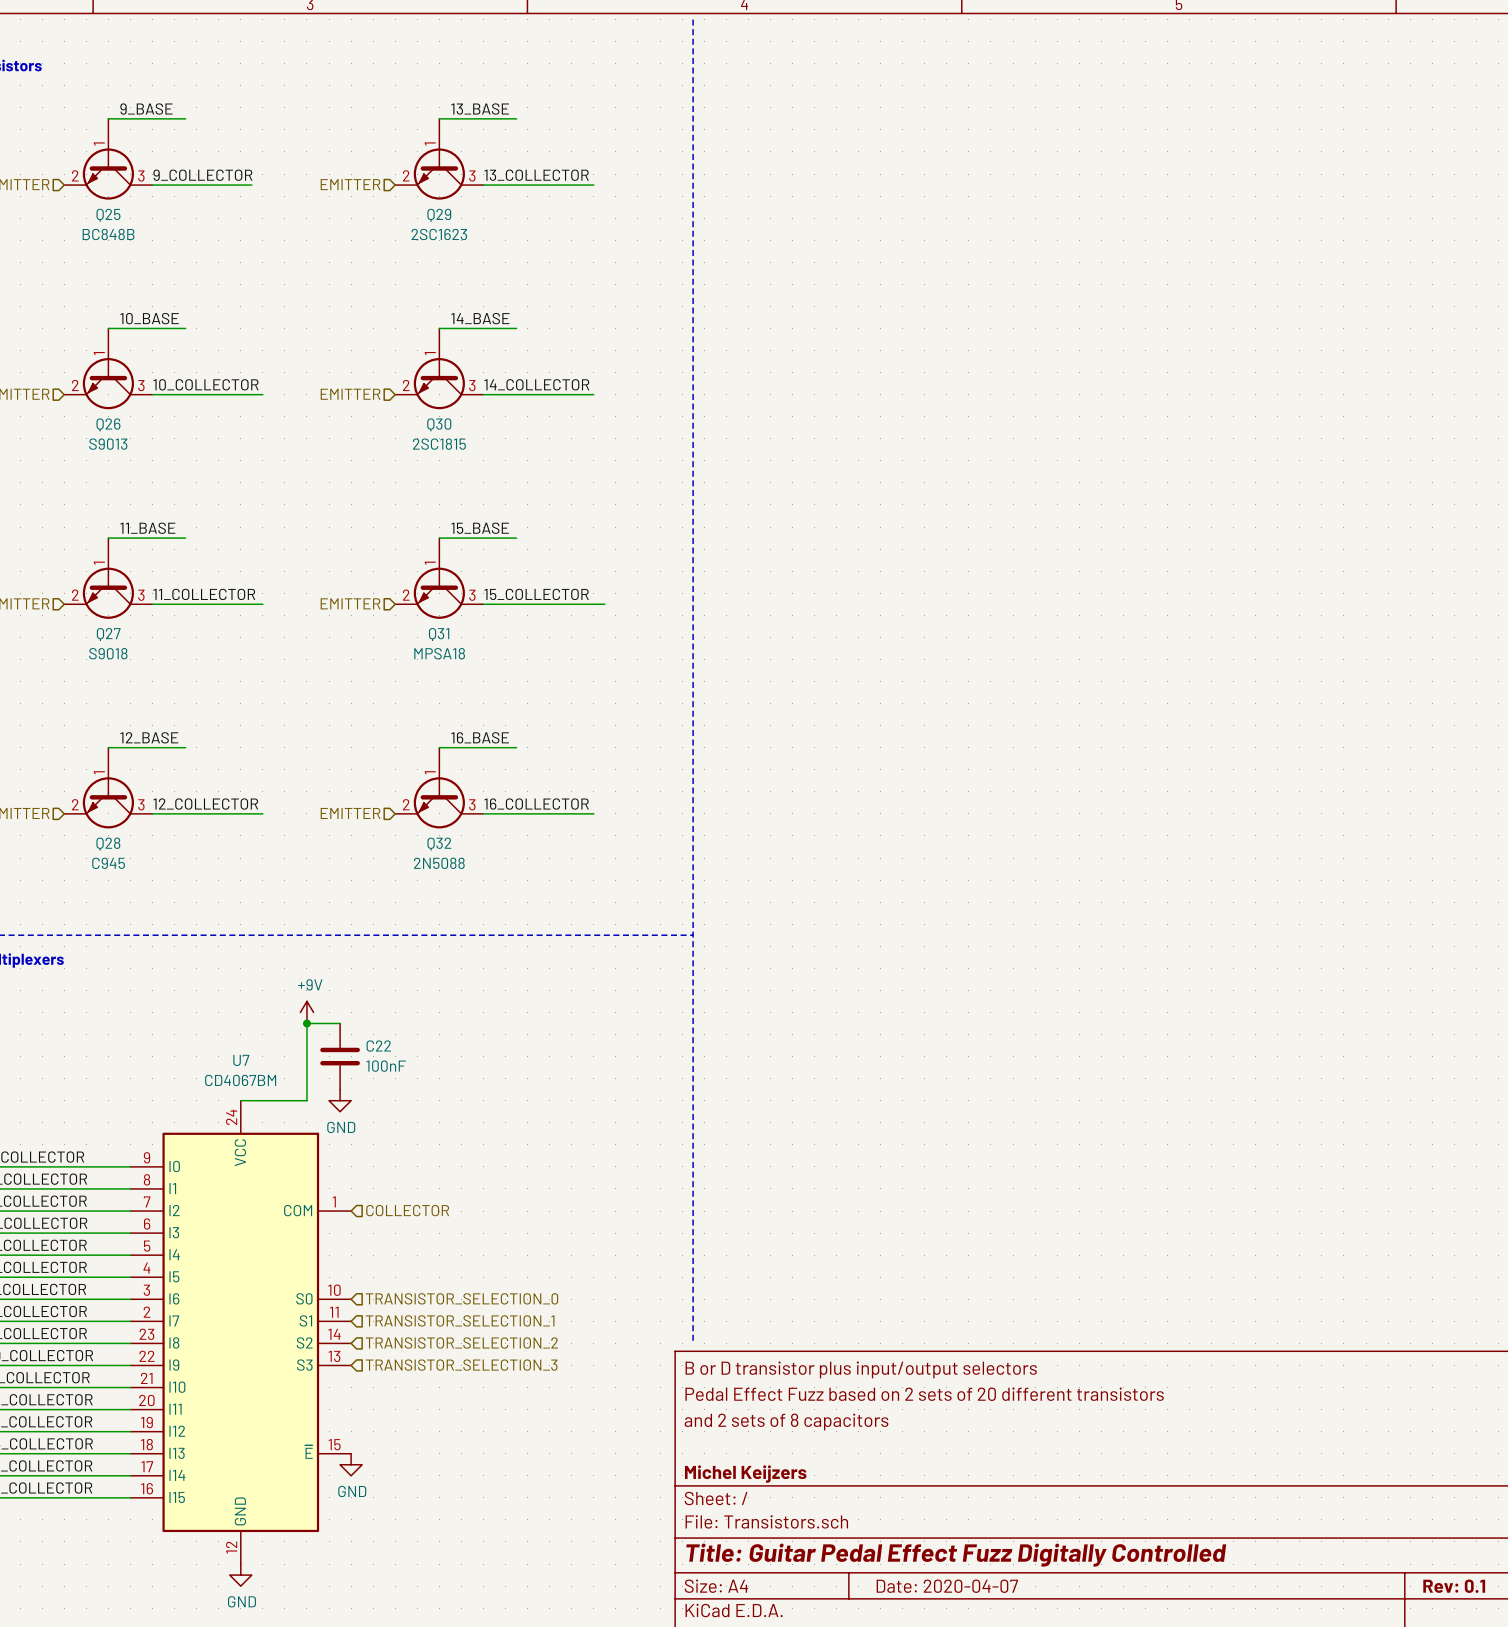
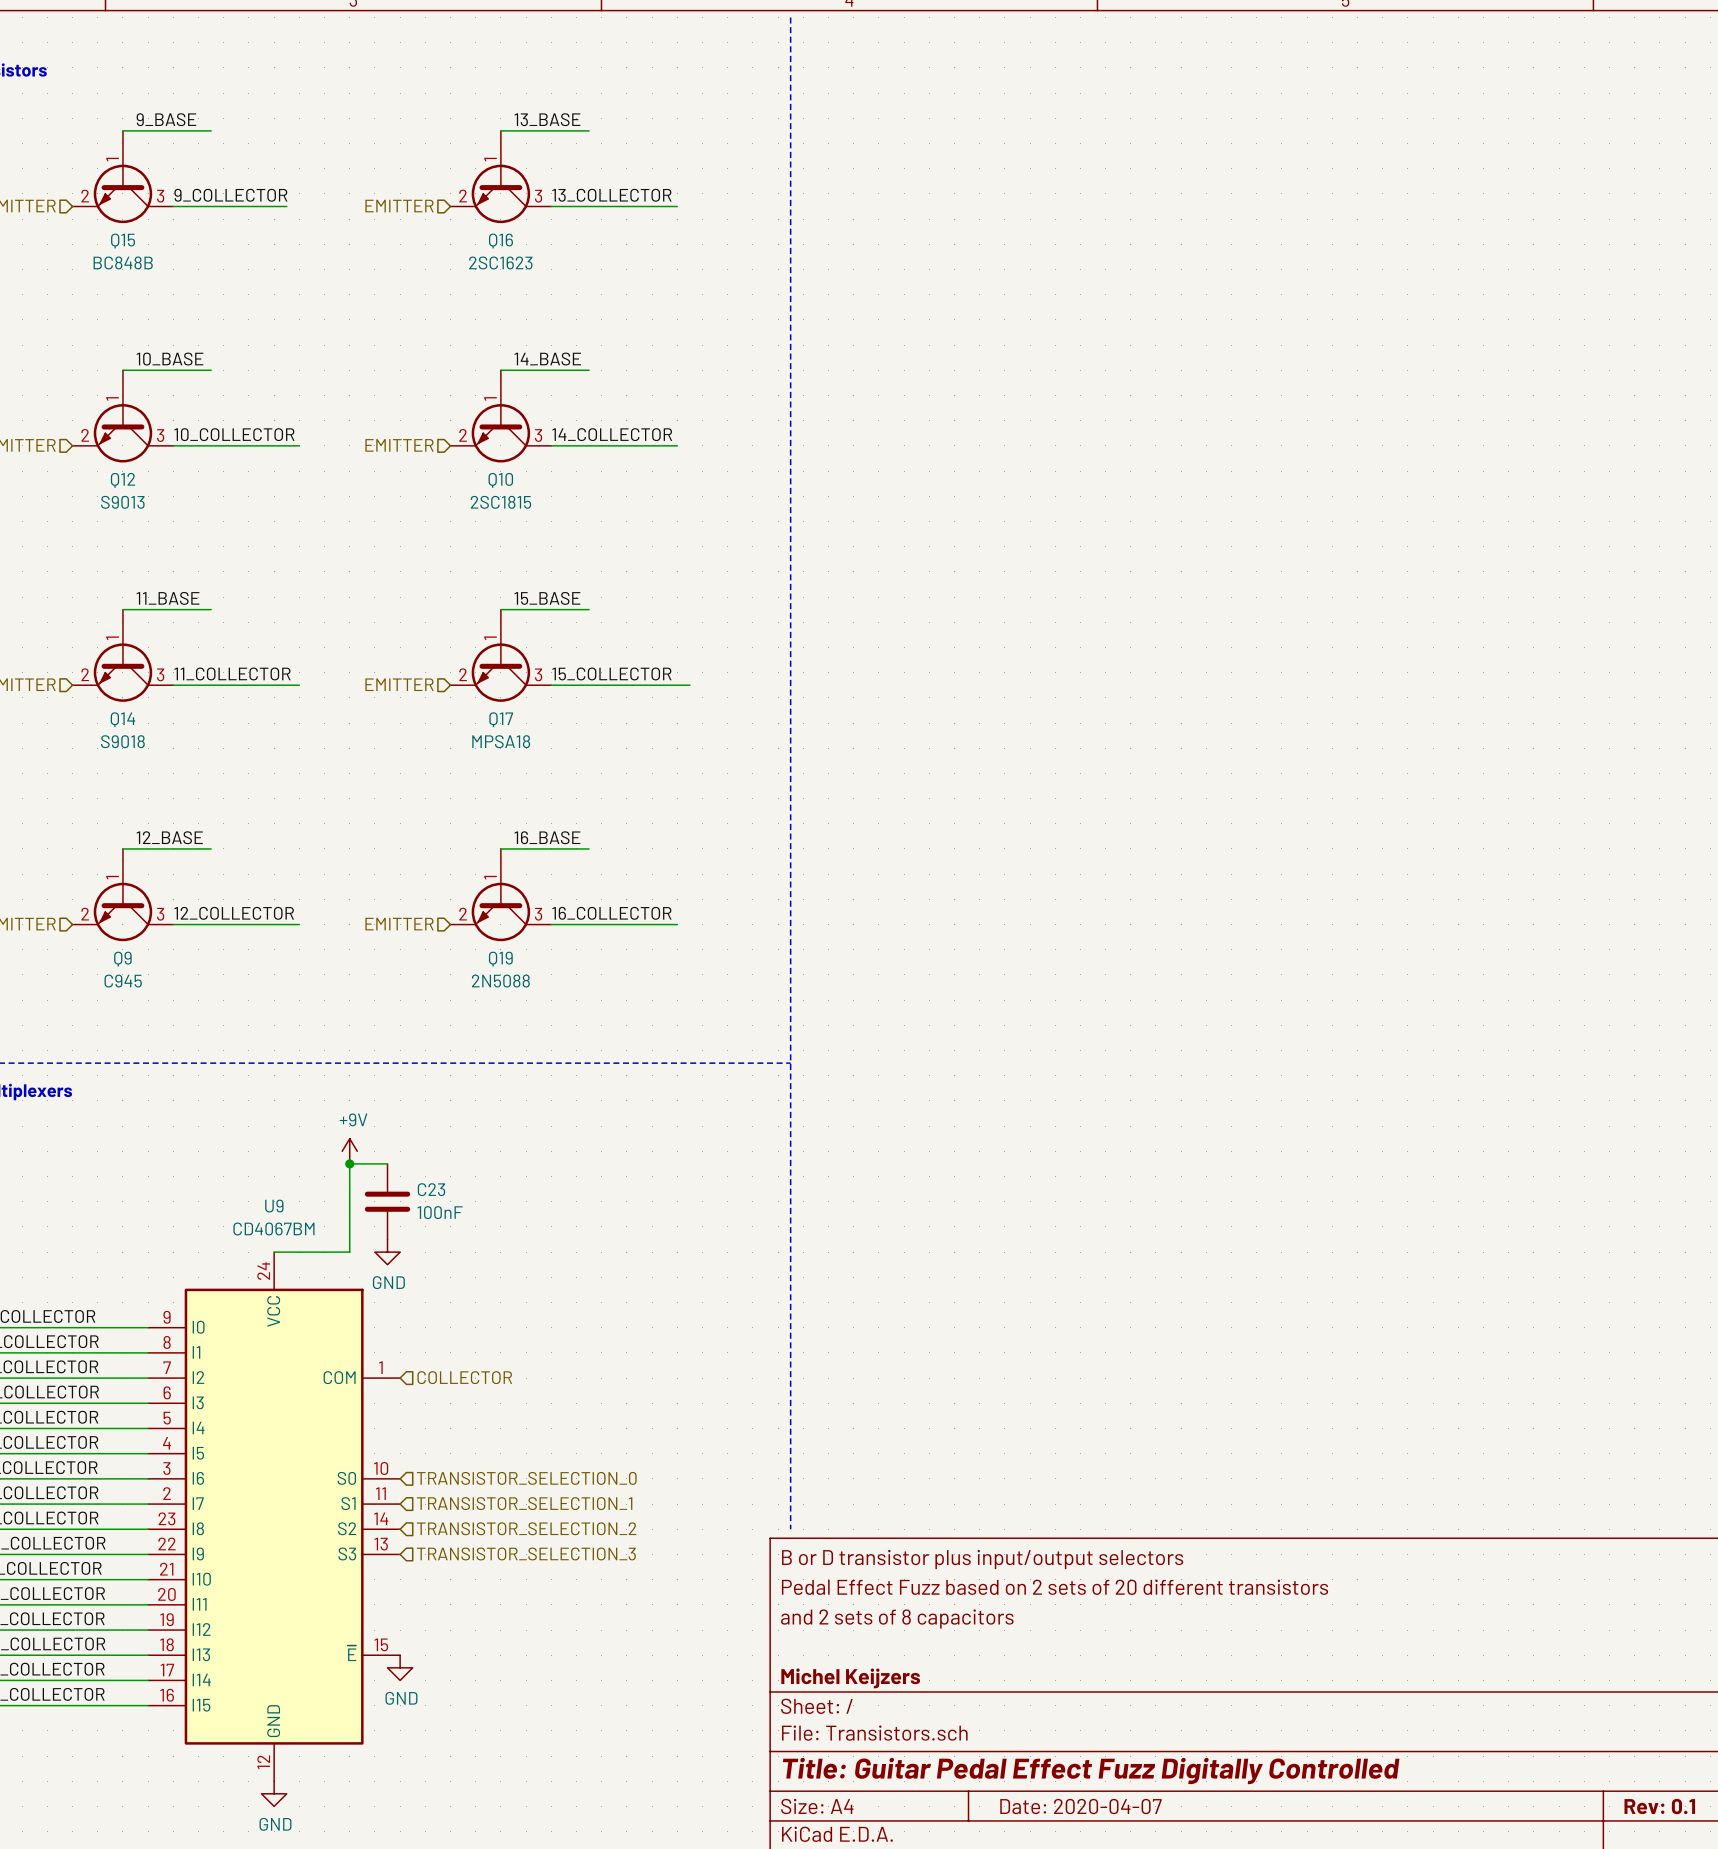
Q25 name: Q25 (108, 215) -> Q15 (123, 241)
Q29 name: Q29 (439, 215) -> Q16 (500, 241)
Q26 name: Q26 (108, 424) -> Q12 (122, 480)
Q30 name: Q30 (439, 424) -> Q10 (500, 480)
Q27 name: Q27 (108, 634) -> Q14 (122, 719)
Q31 name: Q31 (439, 634) -> Q17 (501, 719)
Q28 name: Q28 (108, 844) -> Q9 (122, 959)
Q32 name: Q32 (439, 844) -> Q19 (500, 959)
C22 name: C22 (378, 1046) -> C23 (431, 1189)
U7 name: U7 (241, 1060) -> U9 (274, 1206)

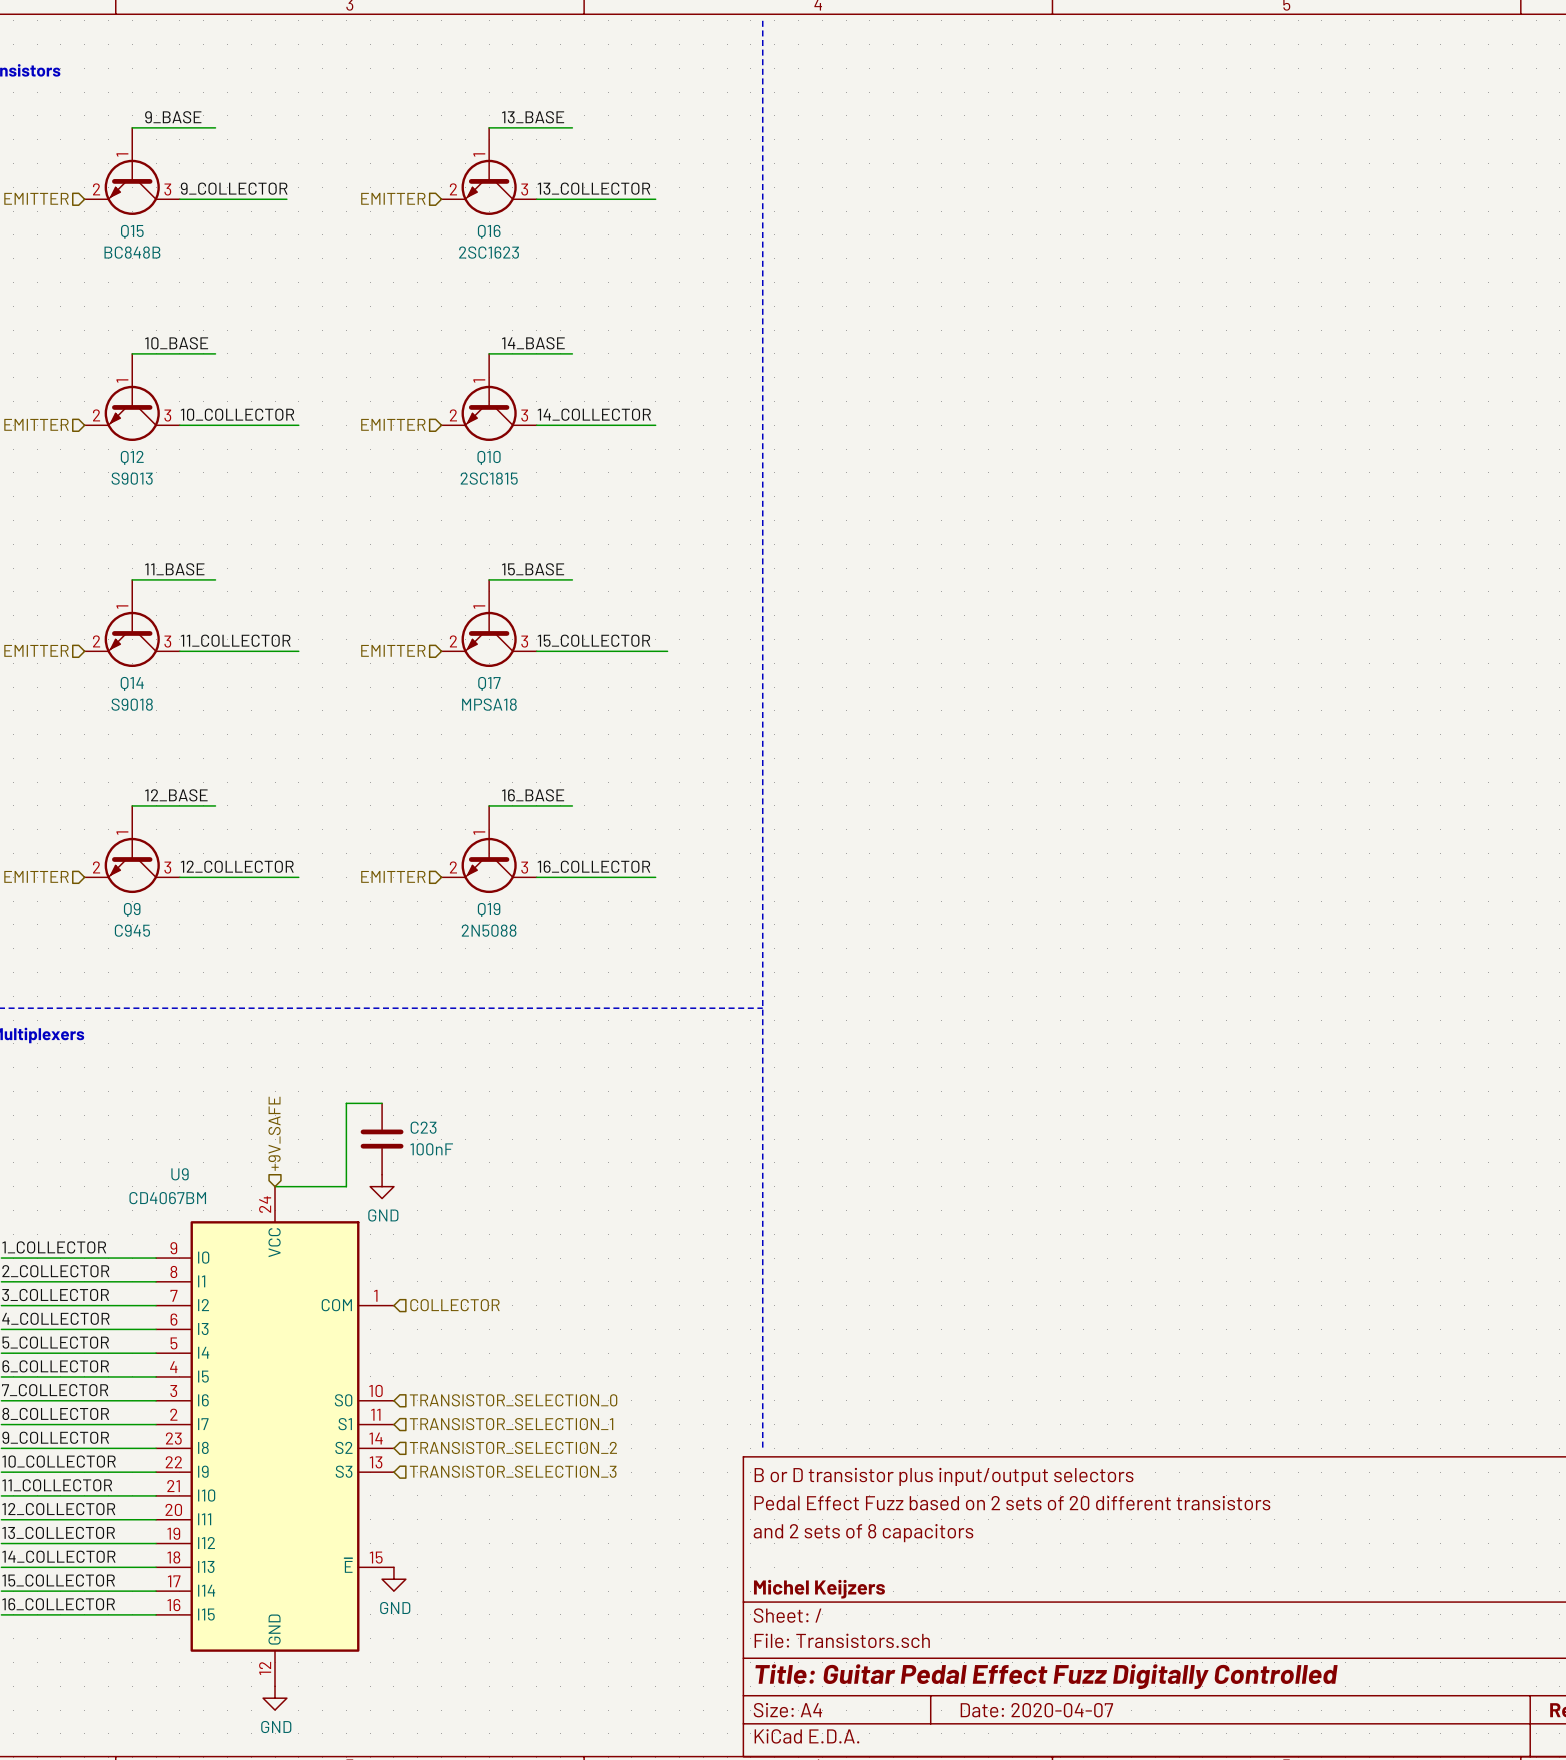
power symbol: +9V (349, 1151) -> none
junction: (349, 1163) -> none
hierarchical label: none -> +9V_SAFE (274, 1133)
U9 name position: U9 (274, 1206) -> U9 (180, 1174)
U9 value position: CD4067BM (273, 1228) -> CD4067BM (167, 1198)

